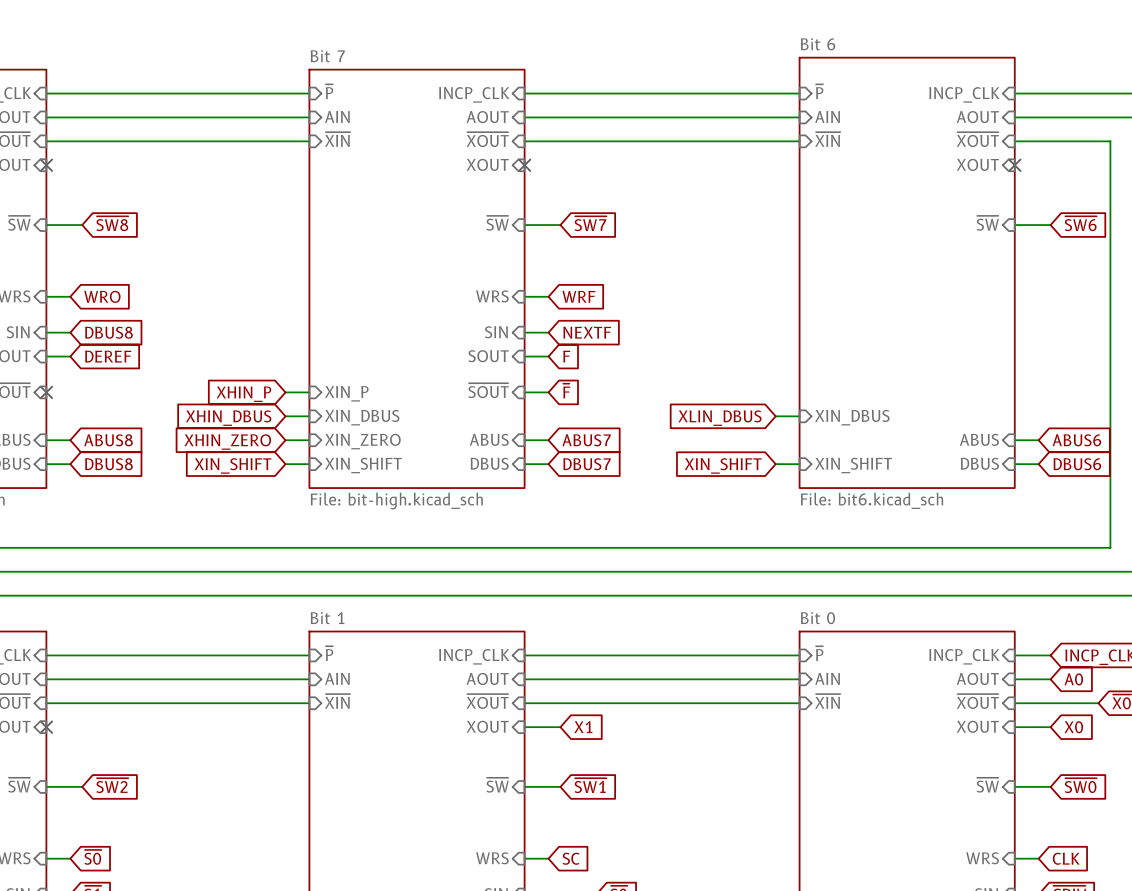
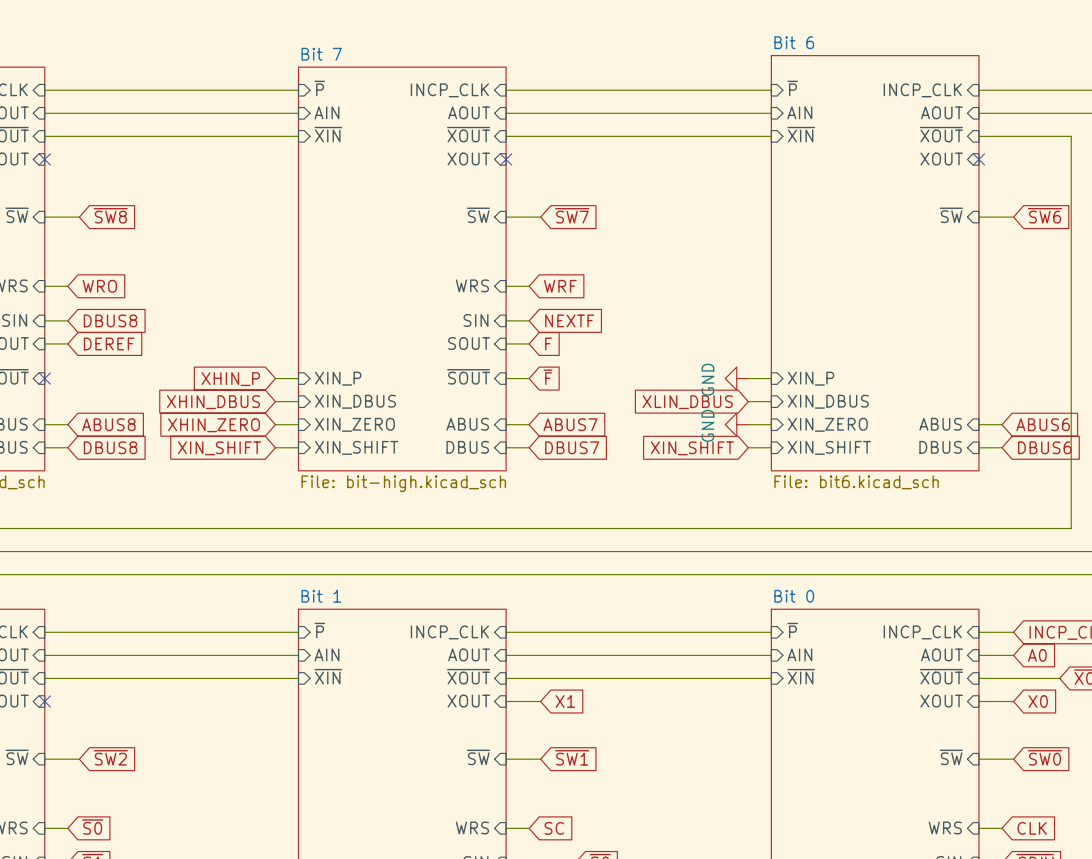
power symbol: none -> GND (736, 378)
wire: none -> (748, 378) (771, 378)
sheet pin: none -> XIN_P (811, 378)
power symbol: none -> GND (736, 424)
wire: none -> (748, 424) (771, 424)
sheet pin: none -> XIN_ZERO (827, 424)

